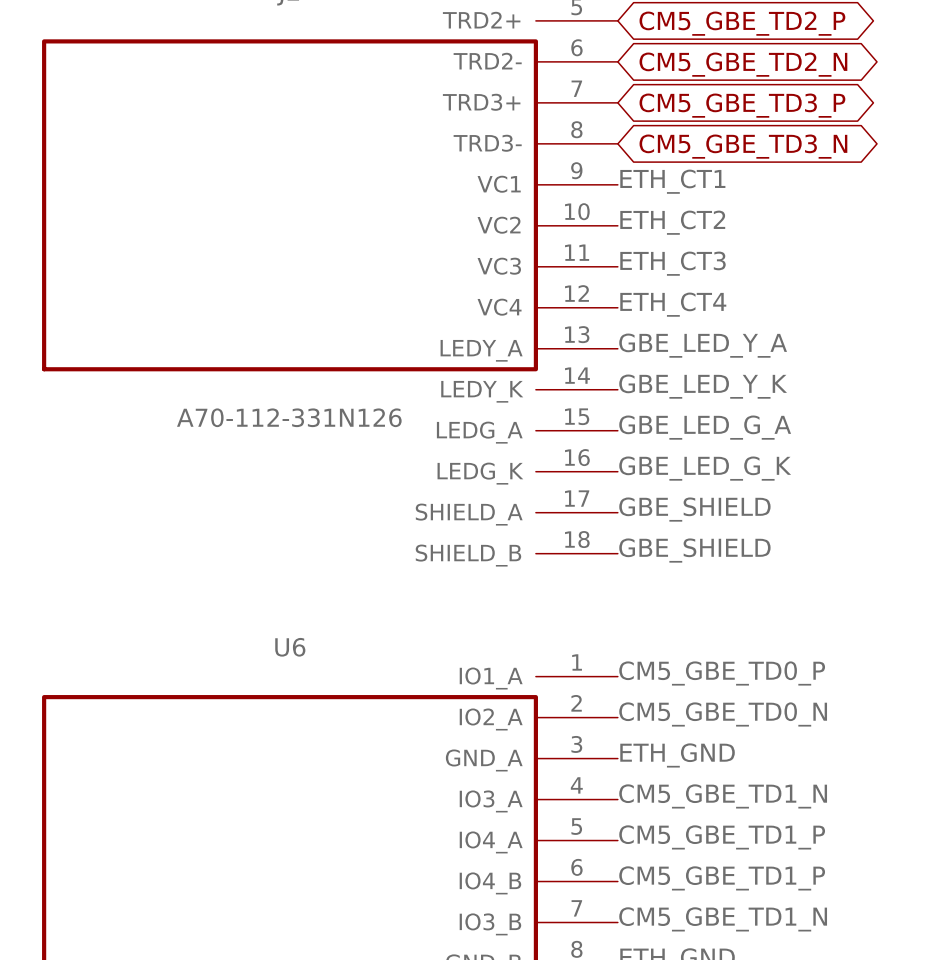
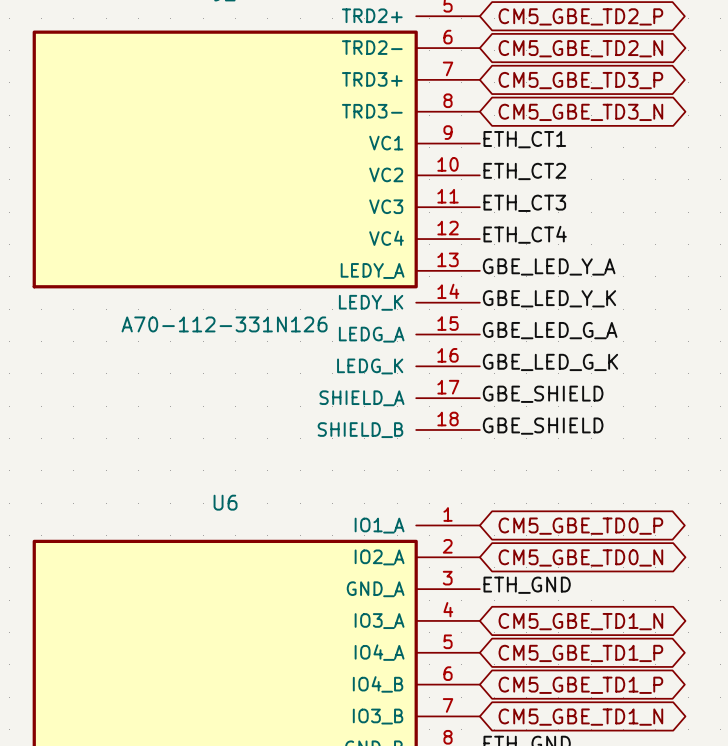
label: CM5_GBE_TD0_P (722, 673) -> none
global label: none -> CM5_GBE_TD0_P (580, 526)
label: CM5_GBE_TD0_N (723, 714) -> none
global label: none -> CM5_GBE_TD0_N (580, 557)
label: CM5_GBE_TD1_N (723, 796) -> none
global label: none -> CM5_GBE_TD1_N (580, 621)
label: CM5_GBE_TD1_P (722, 837) -> none
global label: none -> CM5_GBE_TD1_P (580, 653)
label: CM5_GBE_TD1_P (722, 878) -> none
global label: none -> CM5_GBE_TD1_P (580, 685)
label: CM5_GBE_TD1_N (723, 919) -> none
global label: none -> CM5_GBE_TD1_N (580, 717)

